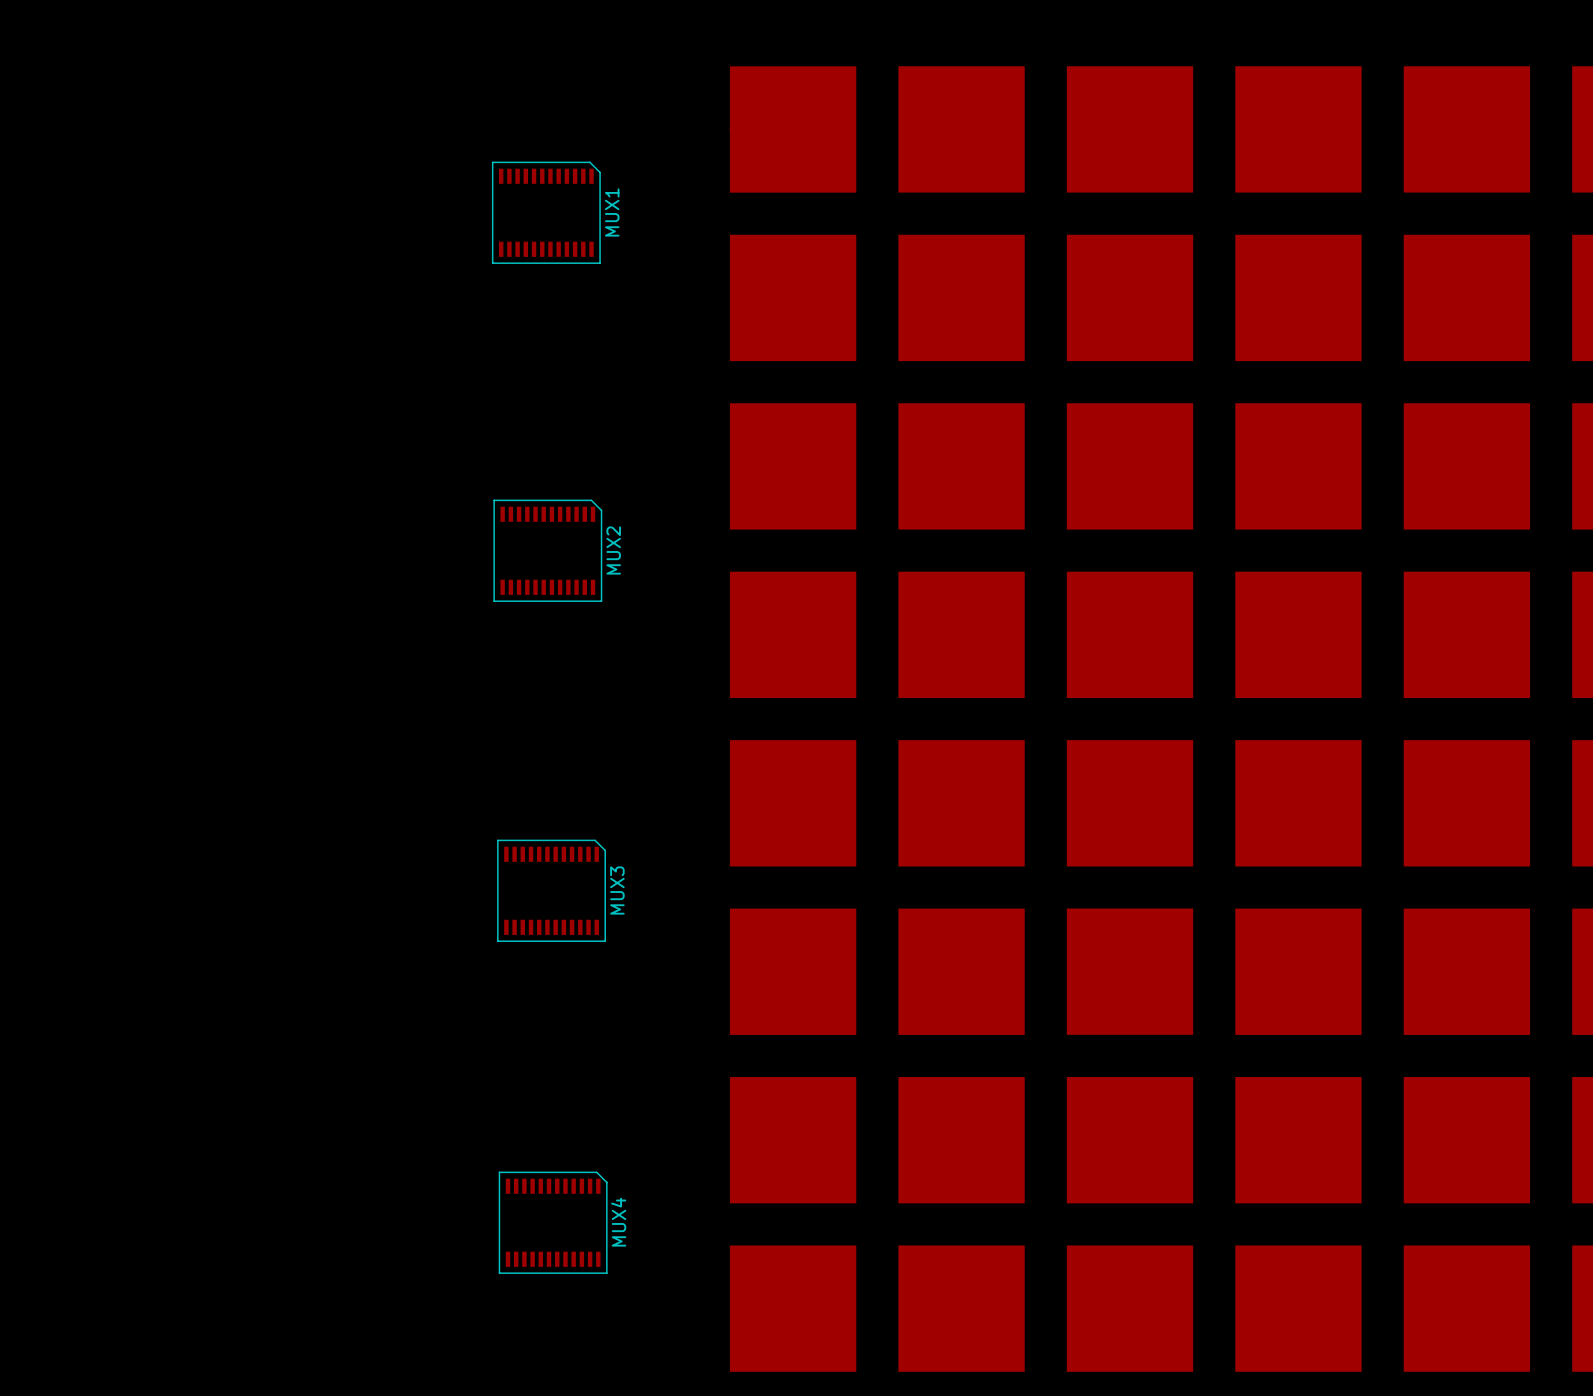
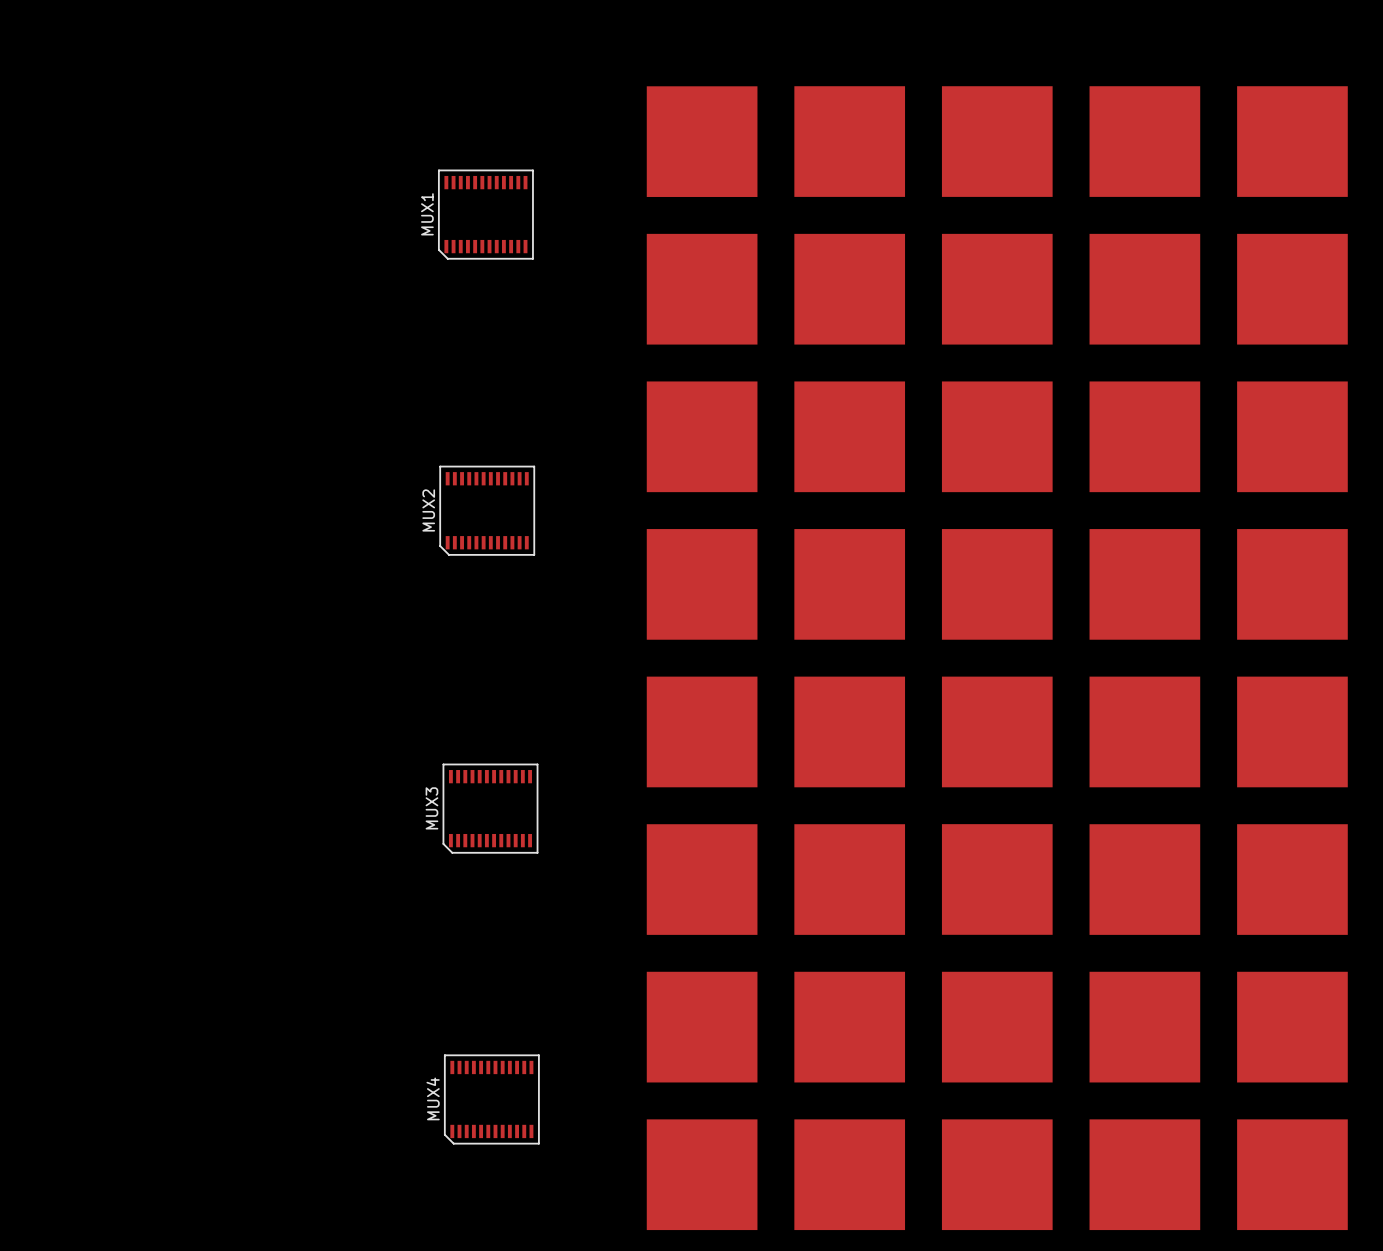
MUX1 rotation: 0° (546, 212) -> 180° (485, 214)
MUX2 rotation: 0° (547, 550) -> 180° (487, 510)
MUX3 rotation: 0° (551, 890) -> 180° (490, 808)
MUX4 rotation: 0° (553, 1222) -> 180° (491, 1099)

